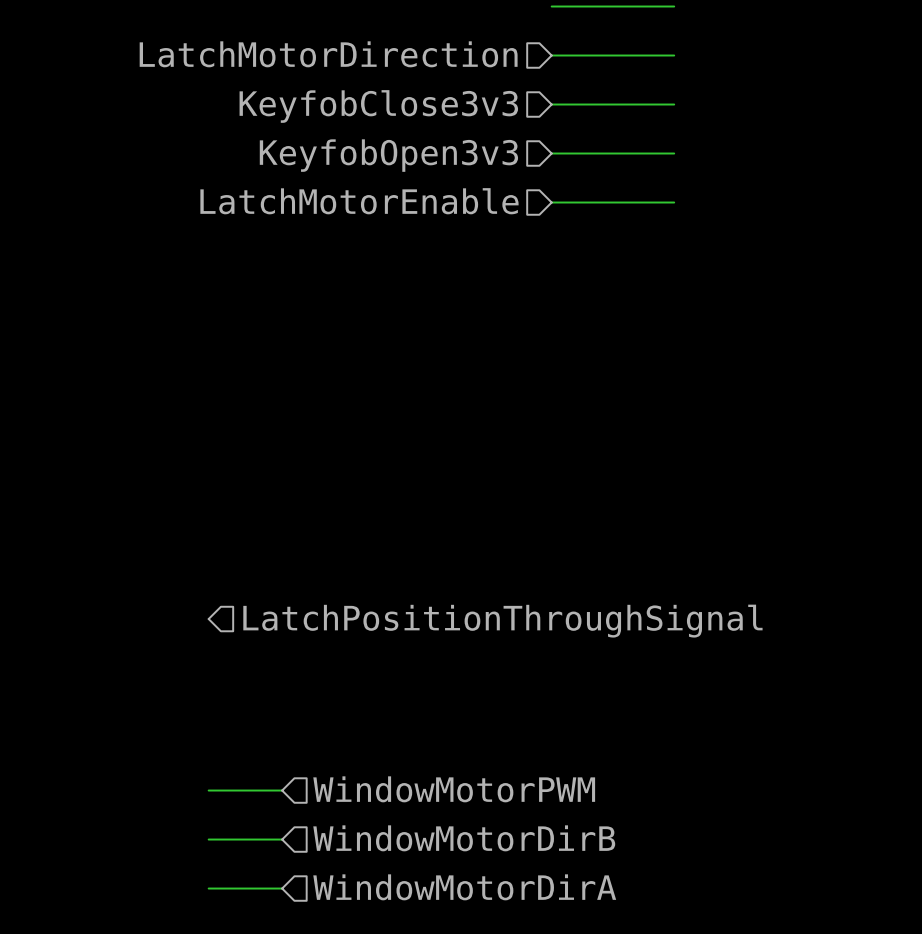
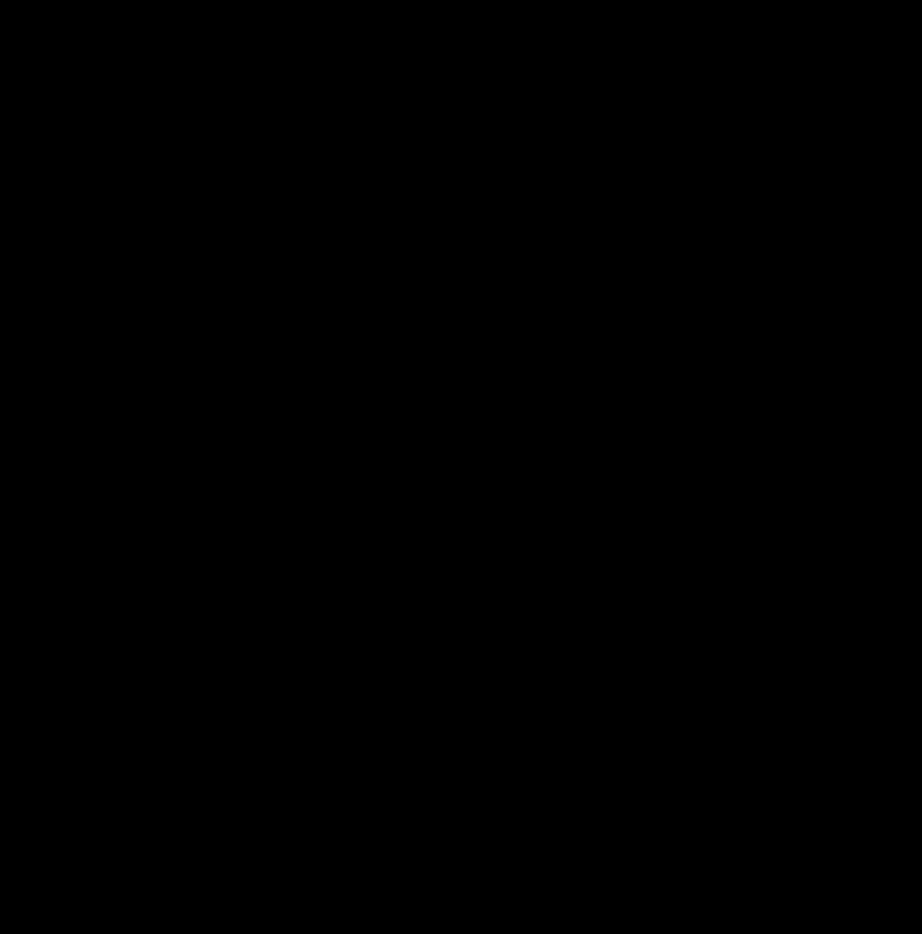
wire: (551, 6) (674, 6) -> none
hierarchical label: LatchMotorDirection (328, 54) -> none
wire: (551, 55) (674, 55) -> none
wire: (551, 104) (674, 104) -> none
hierarchical label: KeyfobClose3v3 (378, 106) -> none
wire: (551, 153) (674, 153) -> none
hierarchical label: KeyfobOpen3v3 (388, 155) -> none
hierarchical label: LatchMotorEnable (359, 201) -> none
wire: (551, 202) (674, 202) -> none
hierarchical label: LatchPositionThroughSignal (502, 621) -> none
hierarchical label: WindowMotorPWM (454, 789) -> none
wire: (208, 790) (282, 790) -> none
hierarchical label: WindowMotorDirB (464, 838) -> none
wire: (208, 839) (282, 839) -> none
hierarchical label: WindowMotorDirA (464, 887) -> none
wire: (208, 888) (282, 888) -> none

